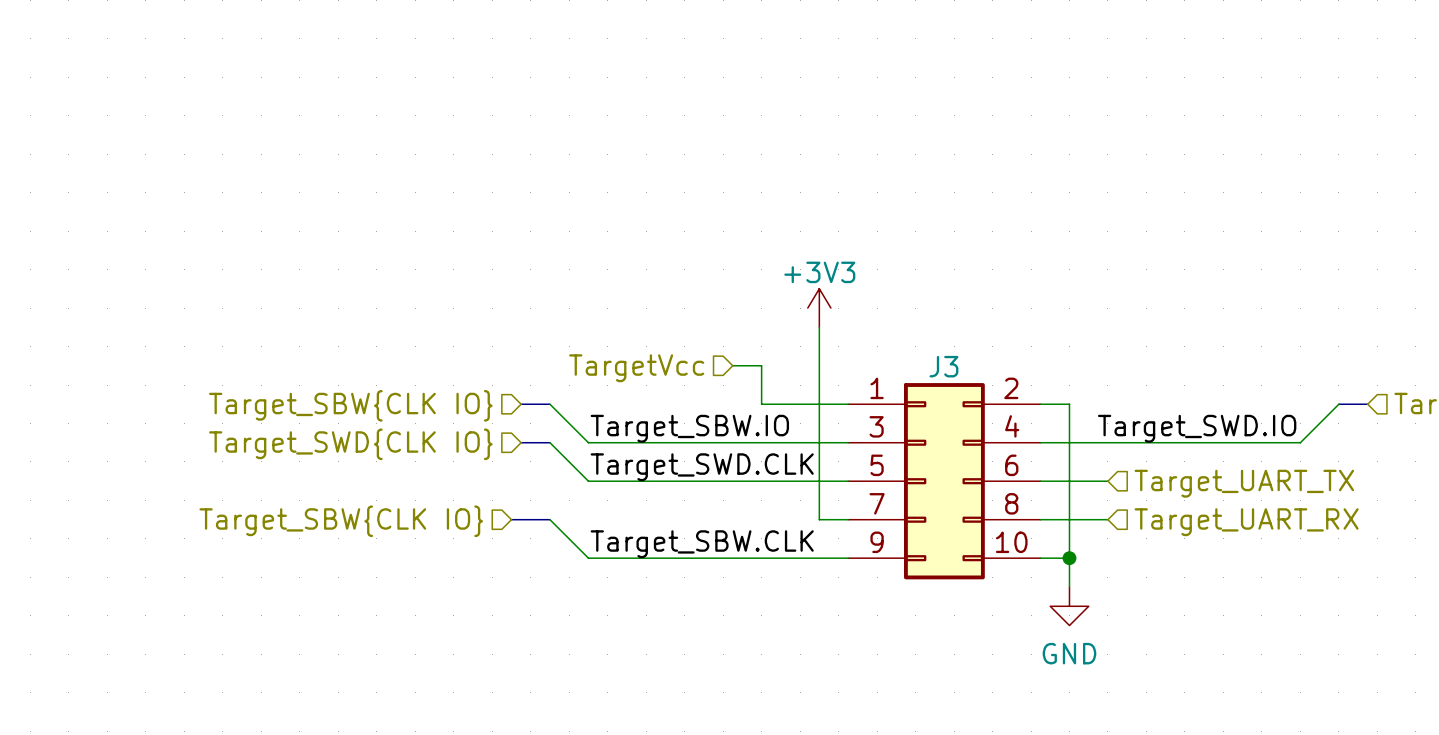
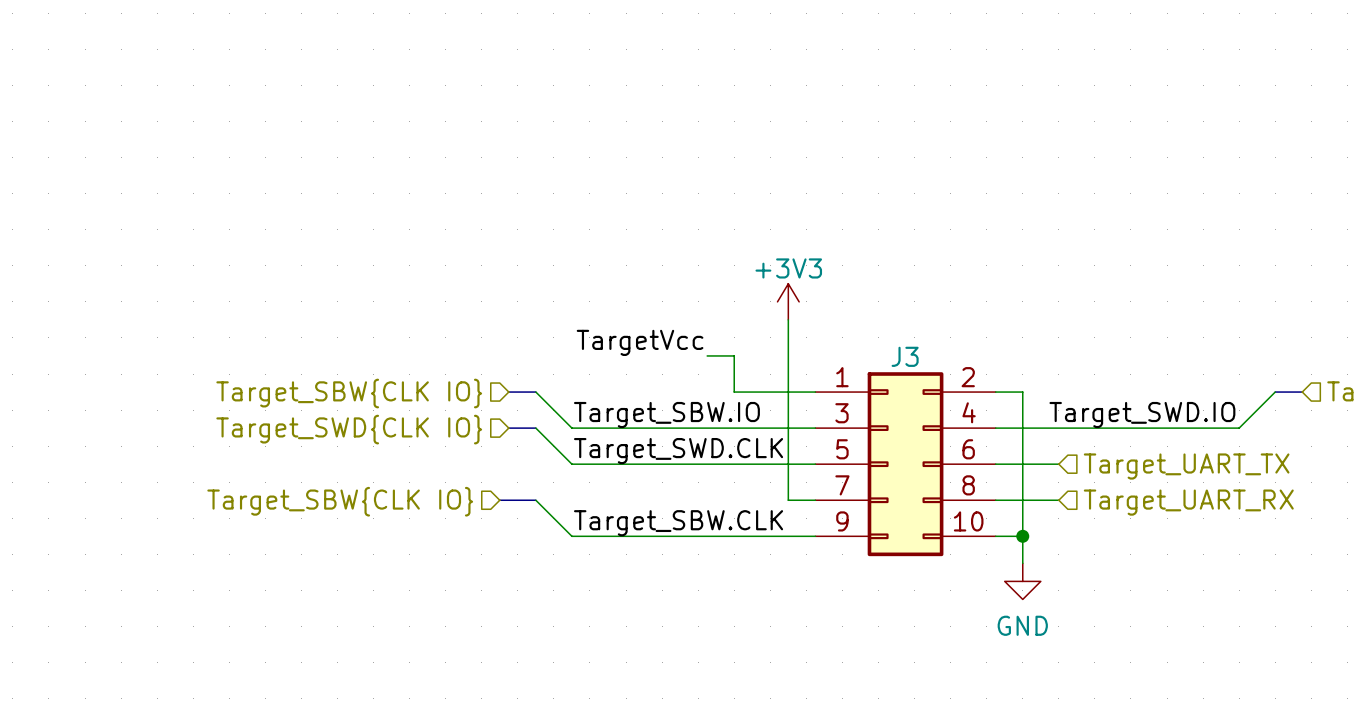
label: none -> TargetVcc (640, 342)
hierarchical label: TargetVcc (636, 368) -> none

